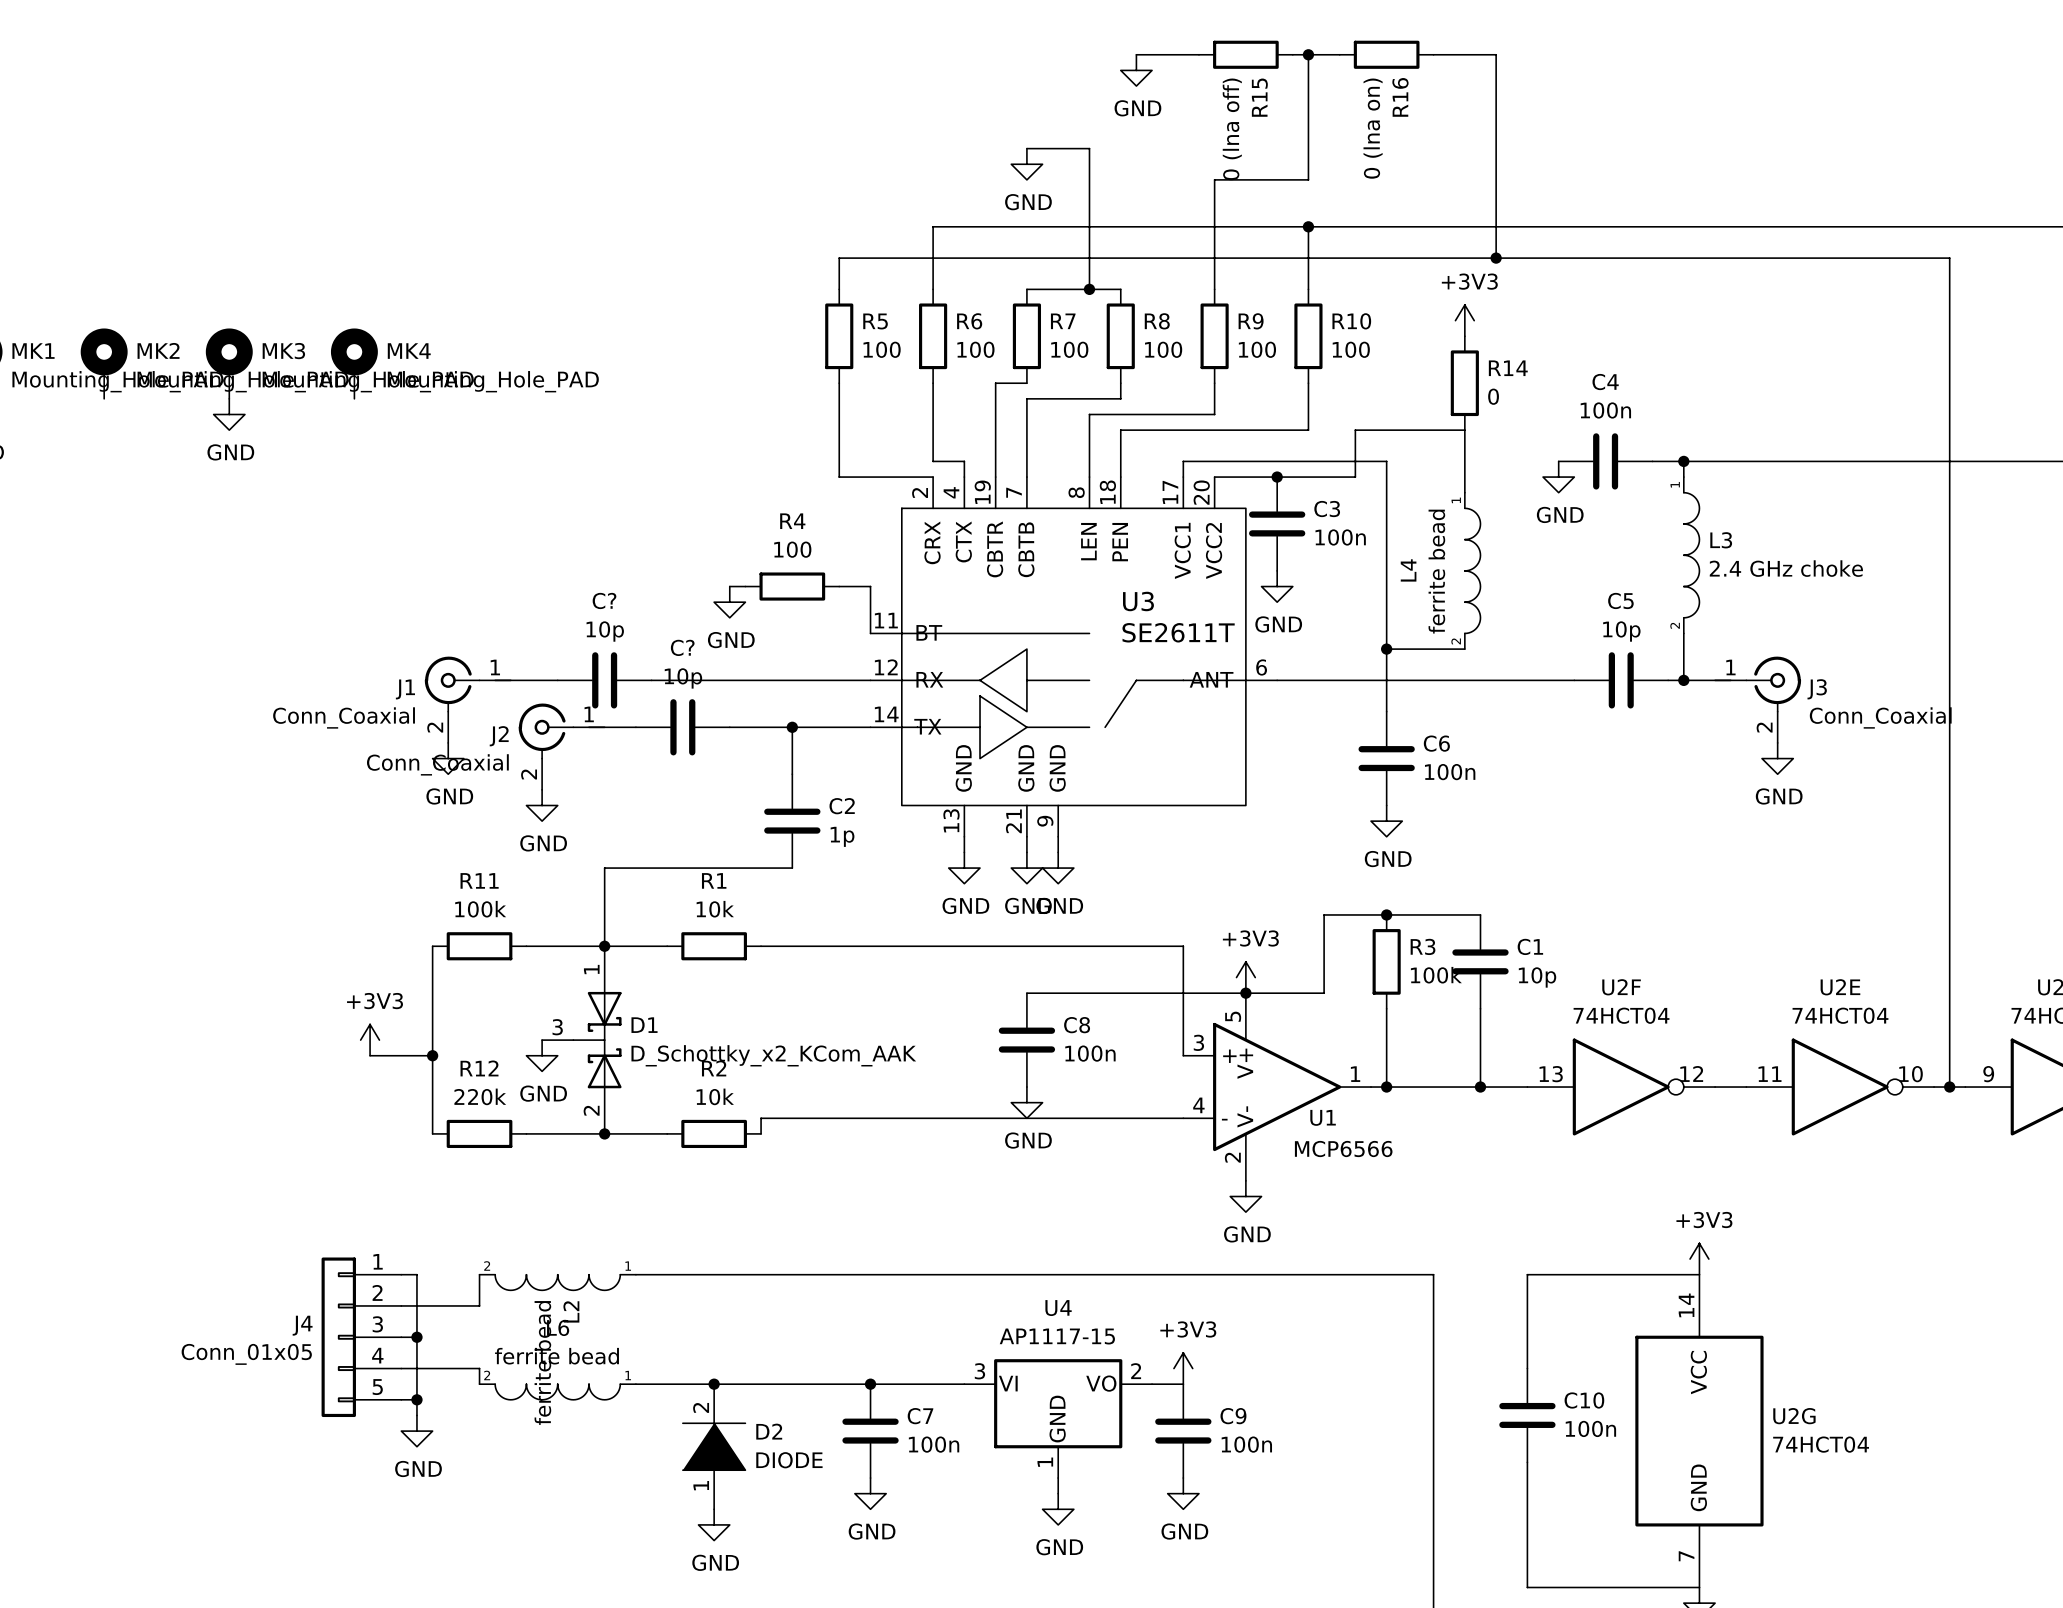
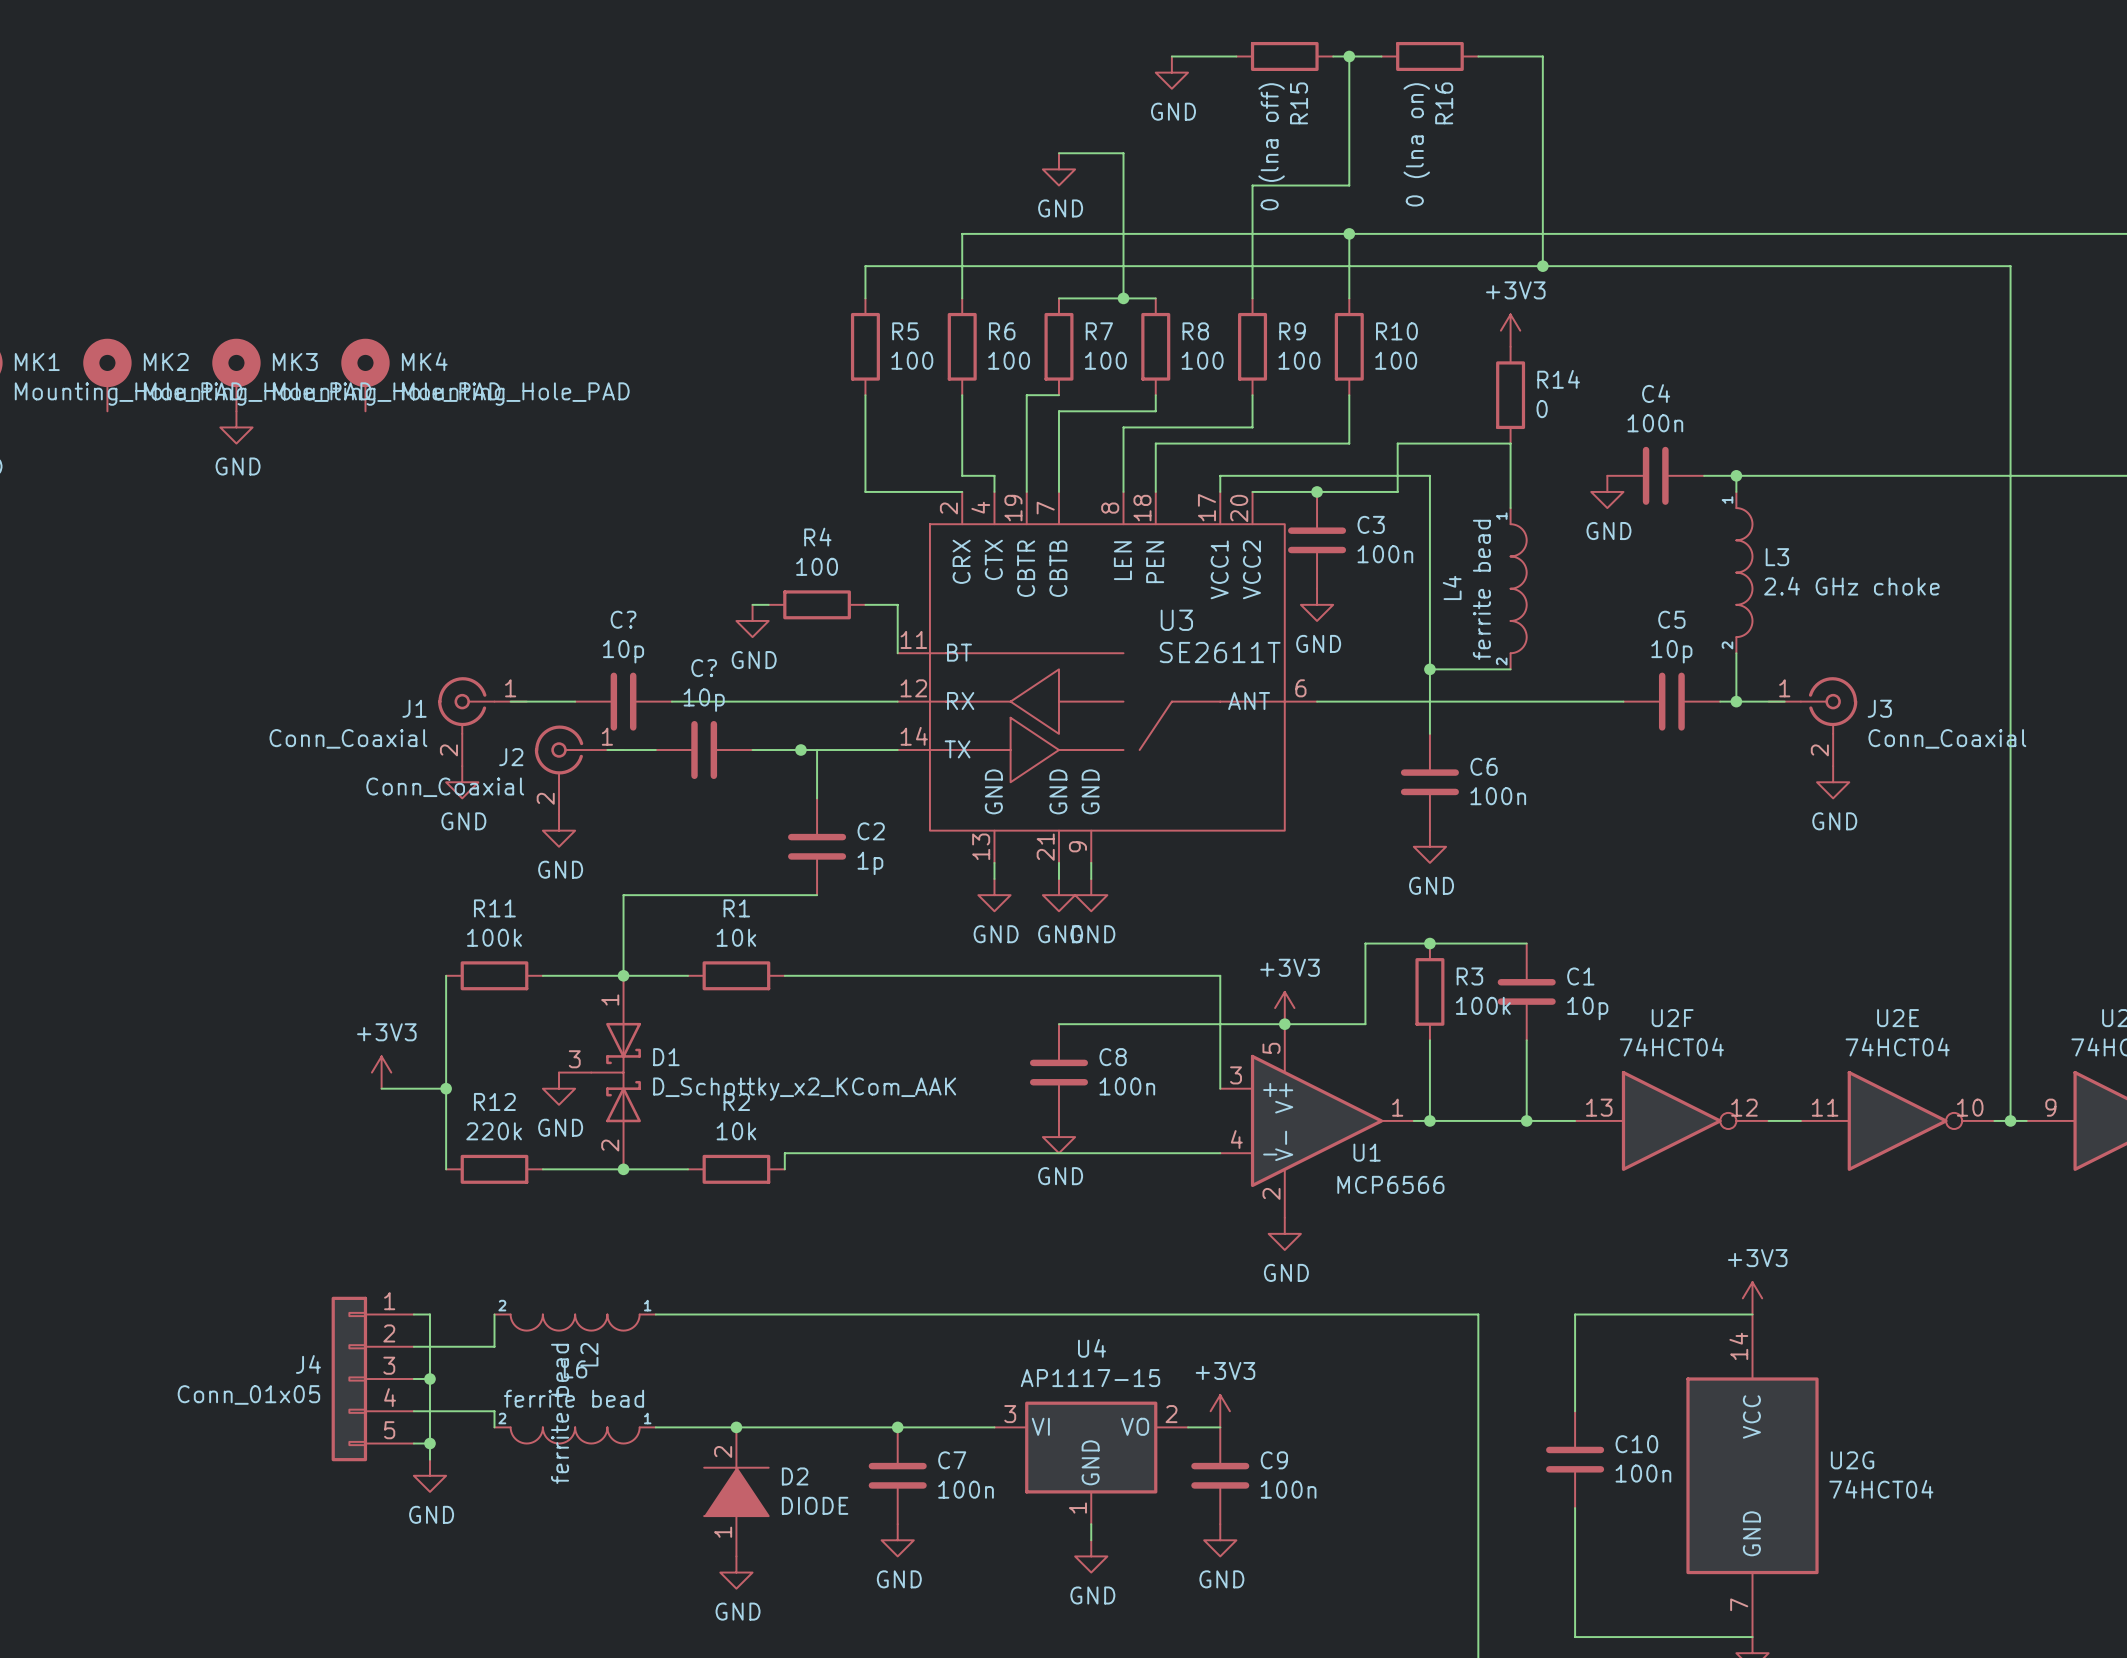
junction position: (792, 727) -> (800, 750)

